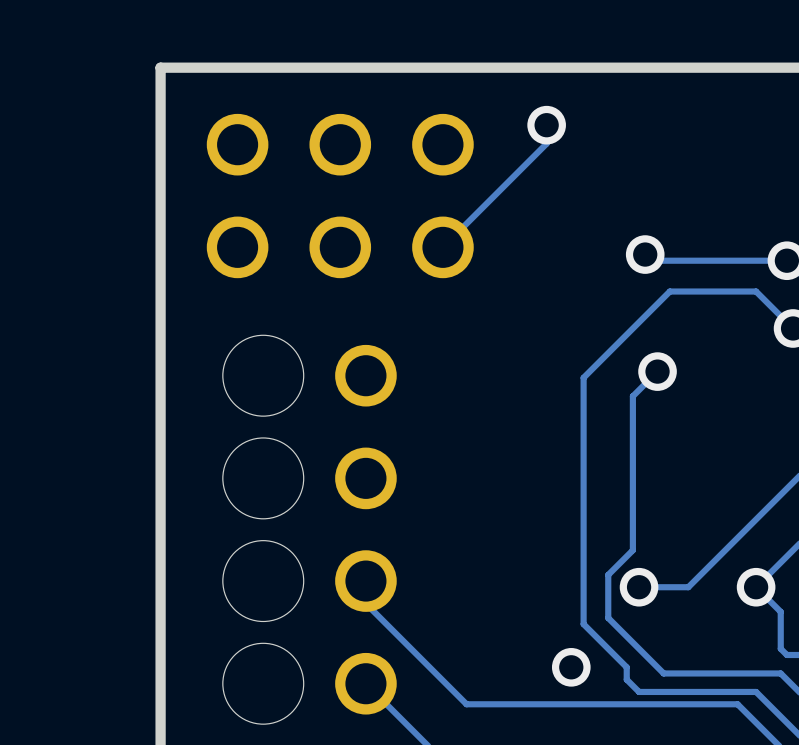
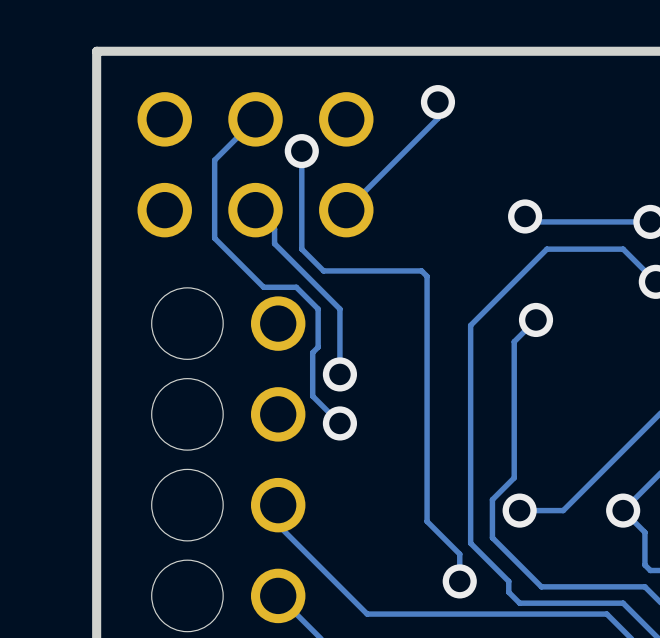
track: none -> (255, 119) (214, 160) (214, 238) (263, 287) (296, 287) (318, 309) (318, 347) (312, 352) (312, 396) (339, 423)
track: none -> (301, 151) (301, 249) (323, 270) (421, 270) (427, 276) (427, 521) (459, 554) (459, 581)
via: none -> (301, 151)
track: none -> (255, 210) (274, 229) (274, 243) (339, 309) (339, 374)
via: none -> (339, 374)
via: none -> (339, 423)

